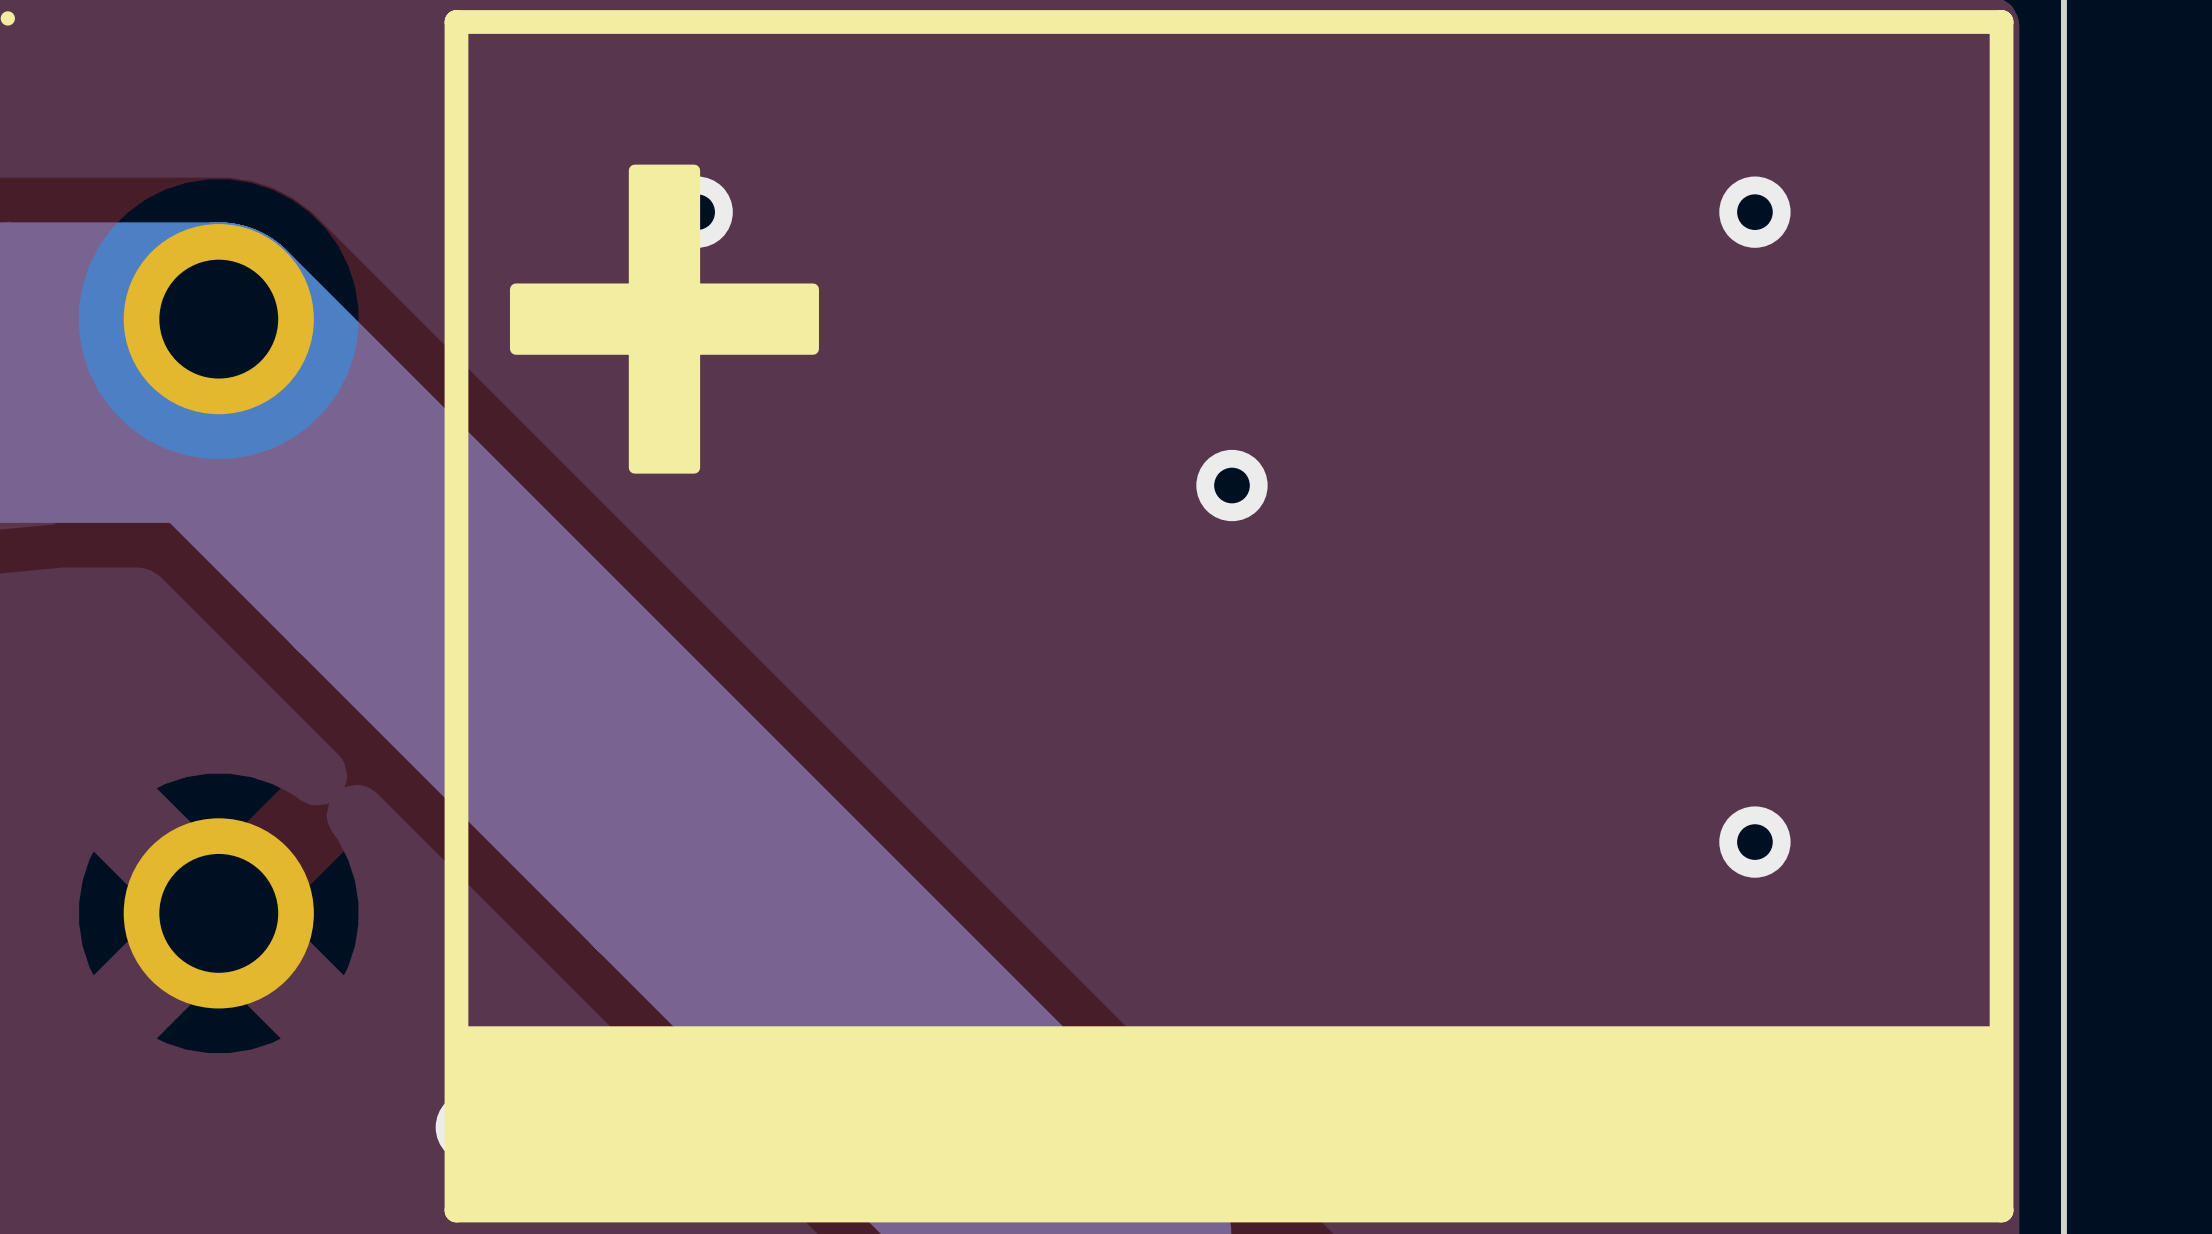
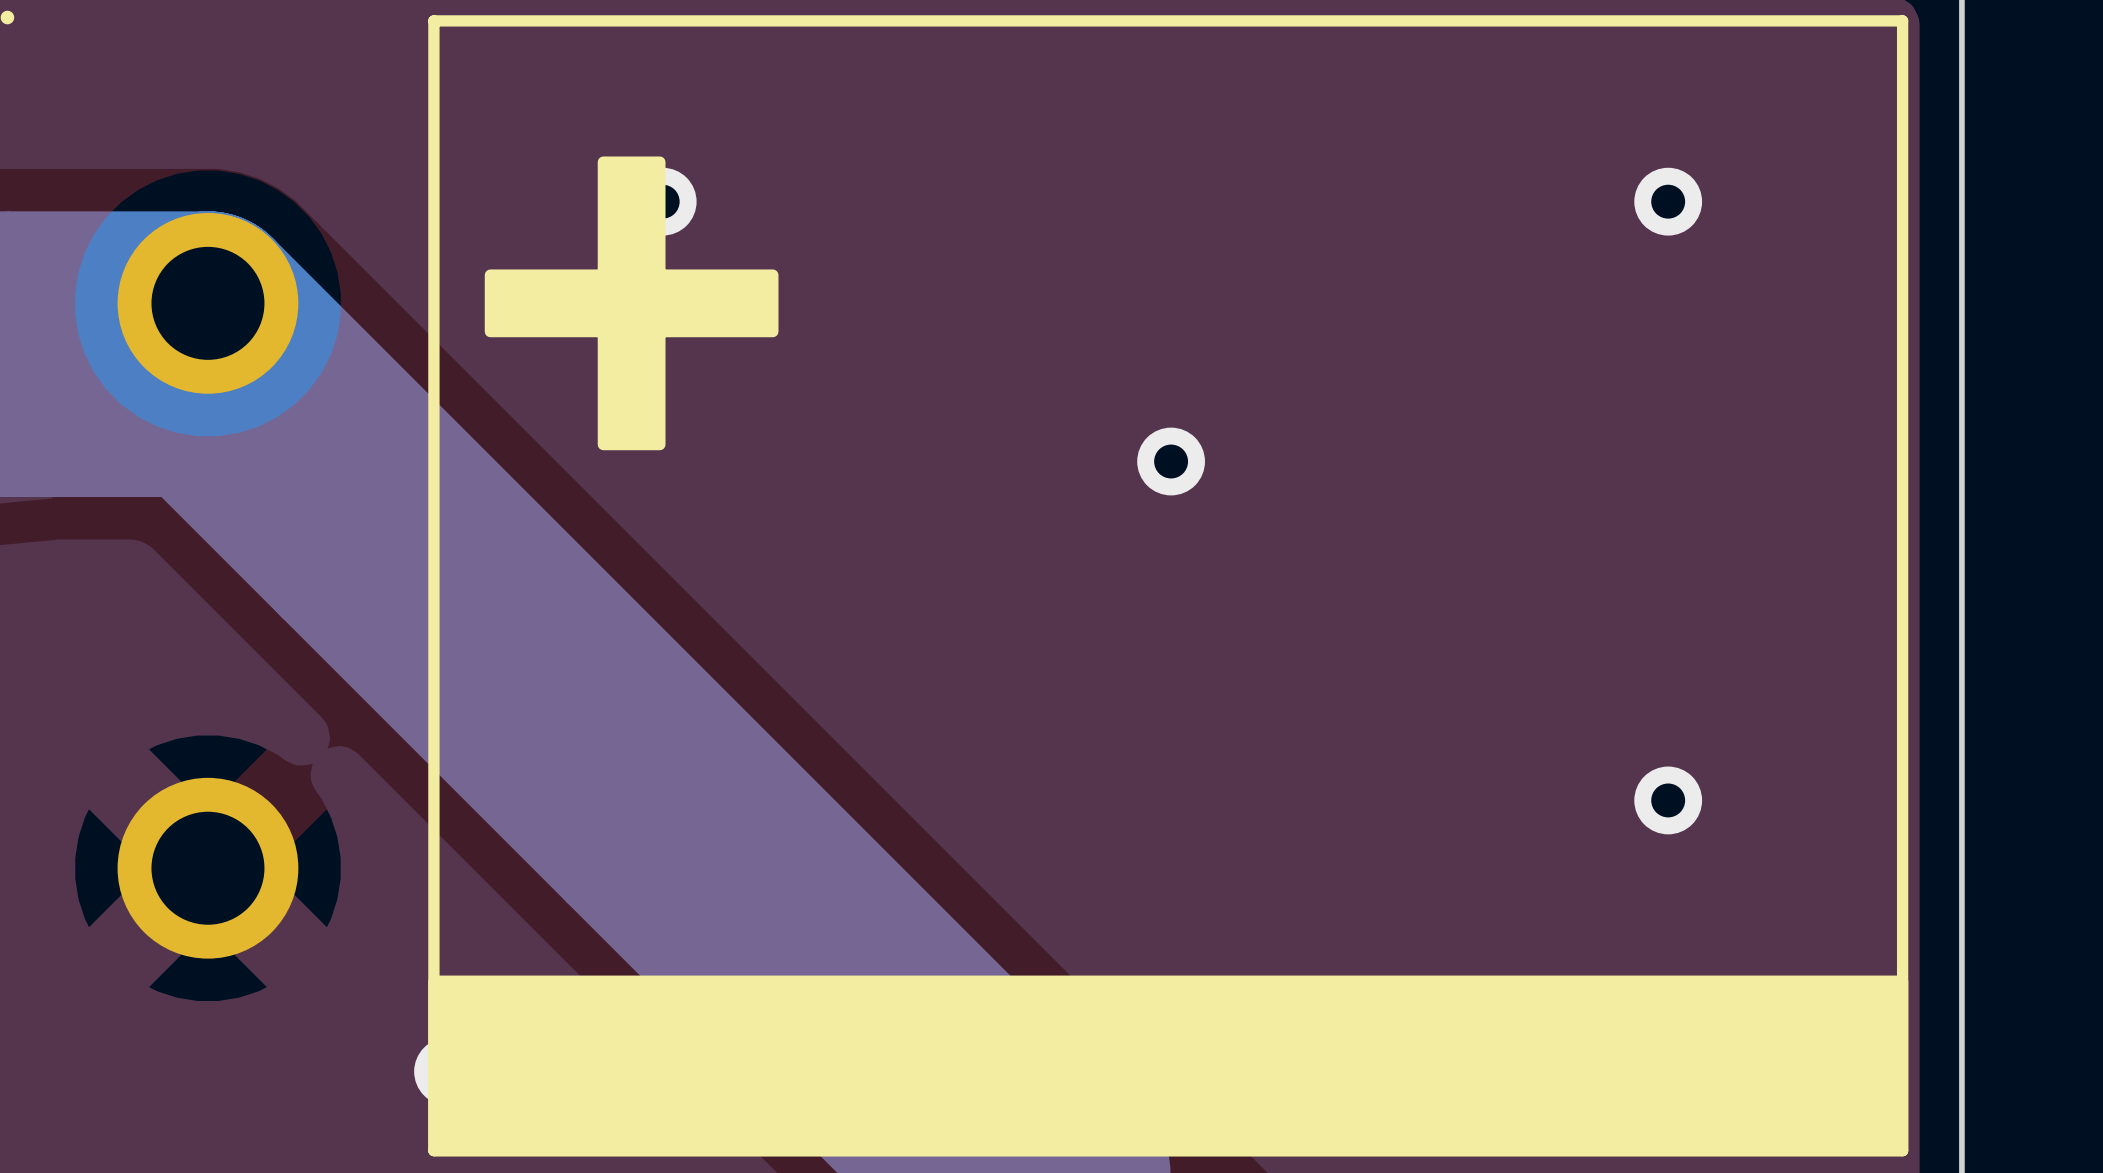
part footprint: [123, 10, 2014, 1223] -> [117, 15, 1909, 1157]

